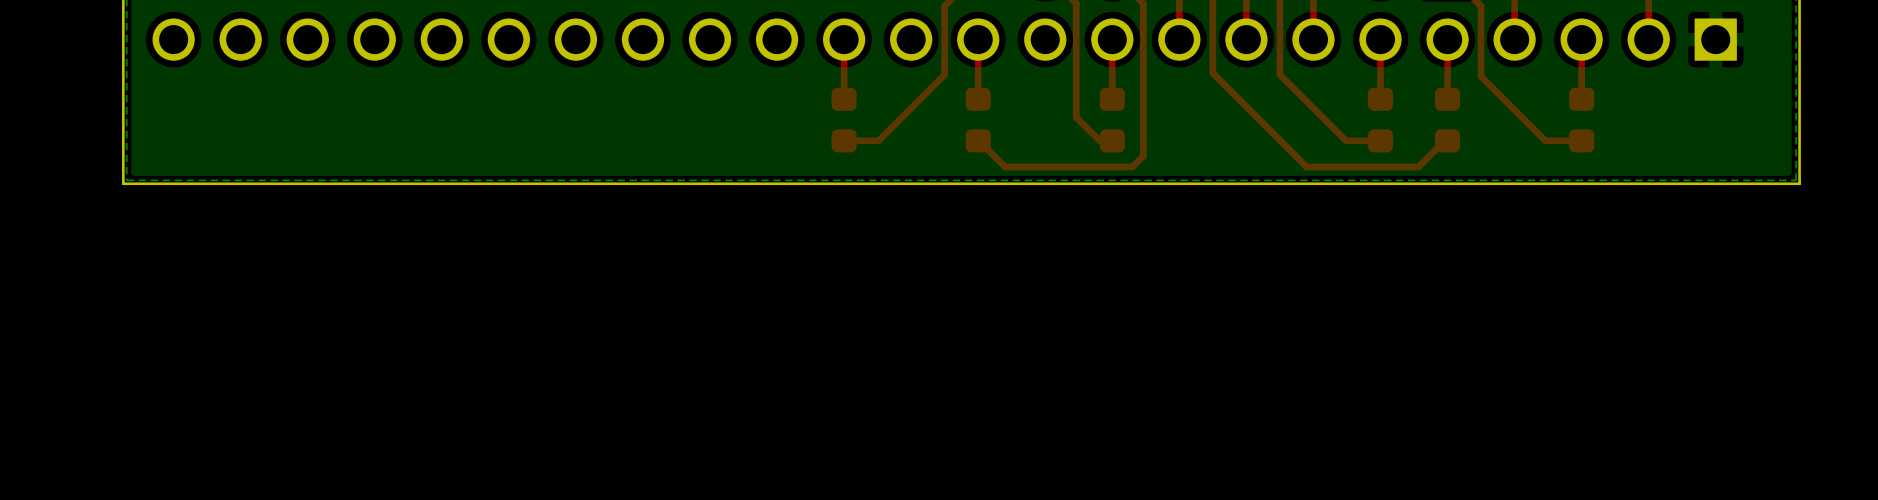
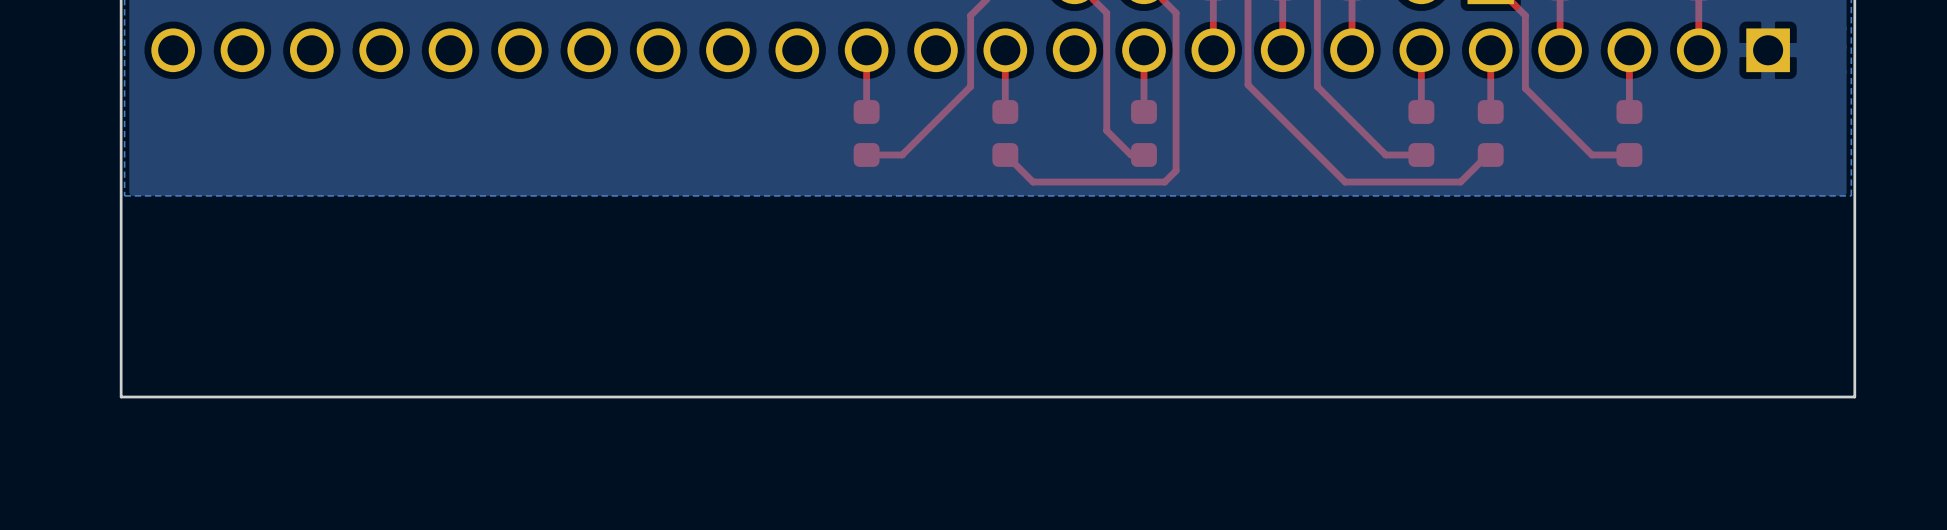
board edge: (1799, 183) (123, 183) -> (1854, 199) (1854, 397) (121, 397) (121, 199)

